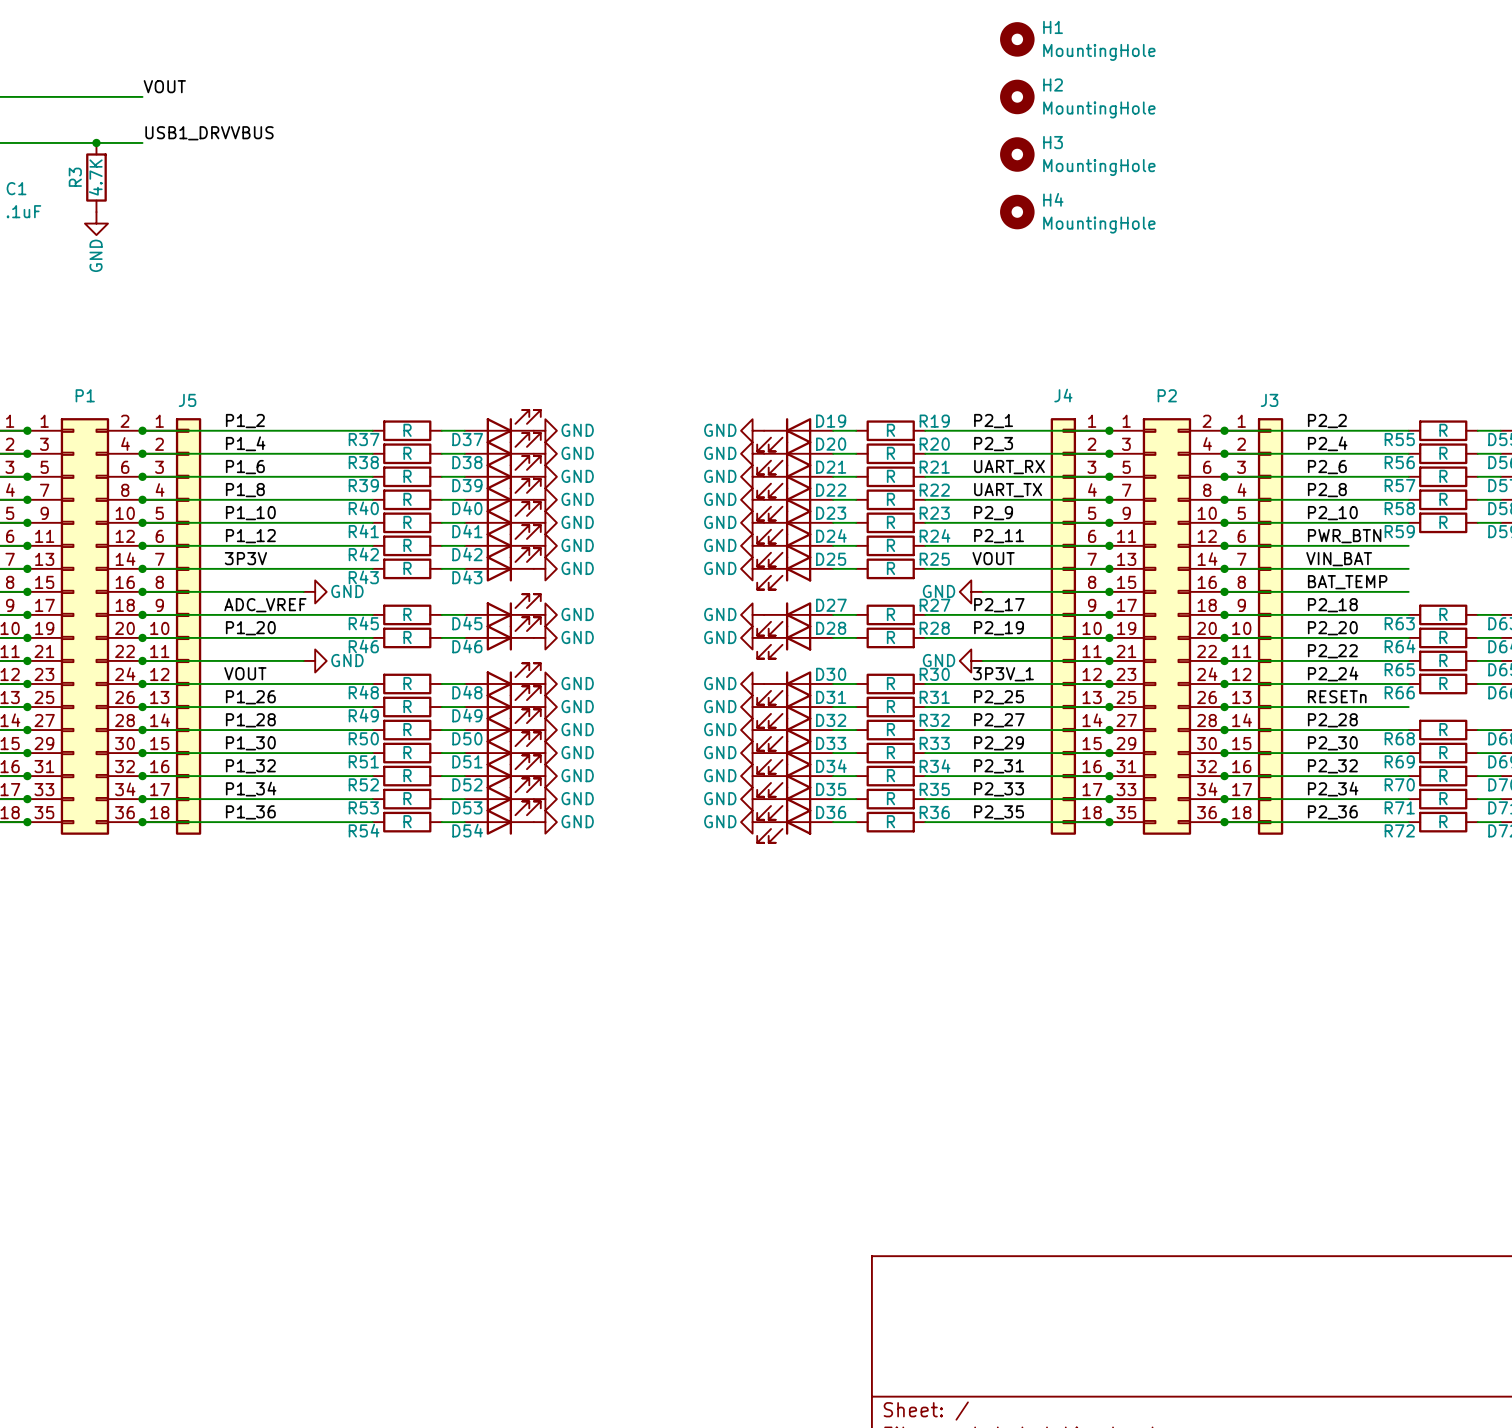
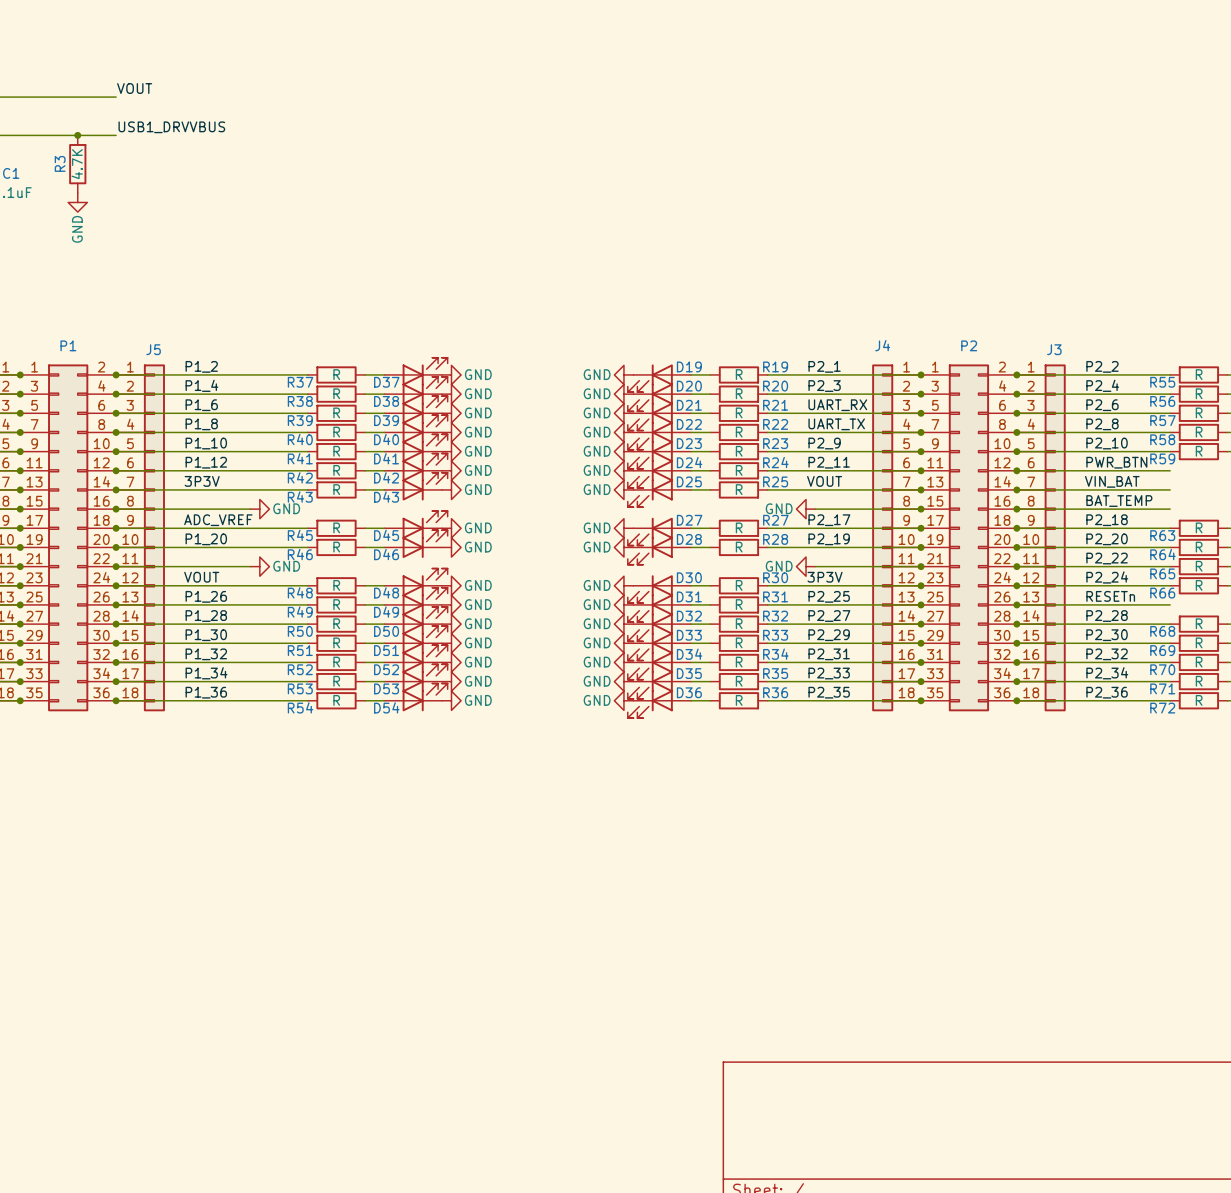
H1: MountingHole (1017, 39) -> none
H2: MountingHole (1017, 96) -> none
H3: MountingHole (1017, 154) -> none
H4: MountingHole (1017, 212) -> none
label: 3P3V_1 (1003, 674) -> 3P3V (825, 577)

